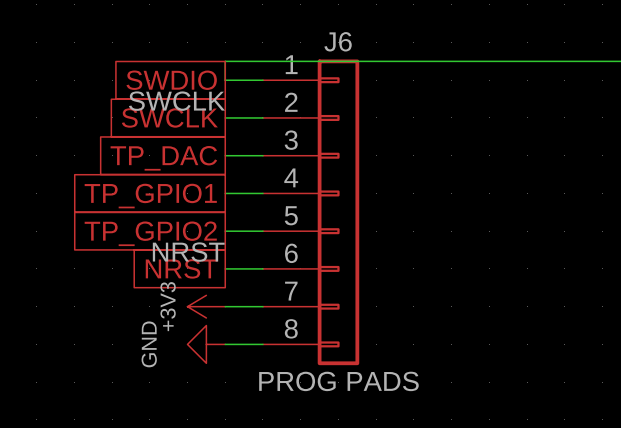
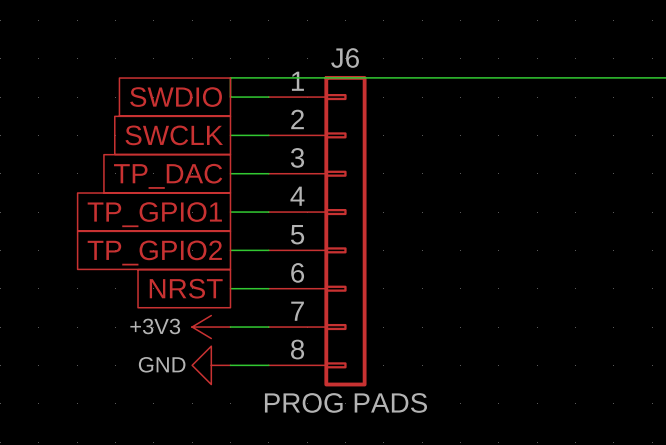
label: SWCLK (176, 101) -> none
label: NRST (188, 252) -> none
power symbol text rotation: 0° (168, 306) -> 90° clockwise (155, 326)
power symbol text rotation: 0° (149, 344) -> 90° clockwise (162, 364)

